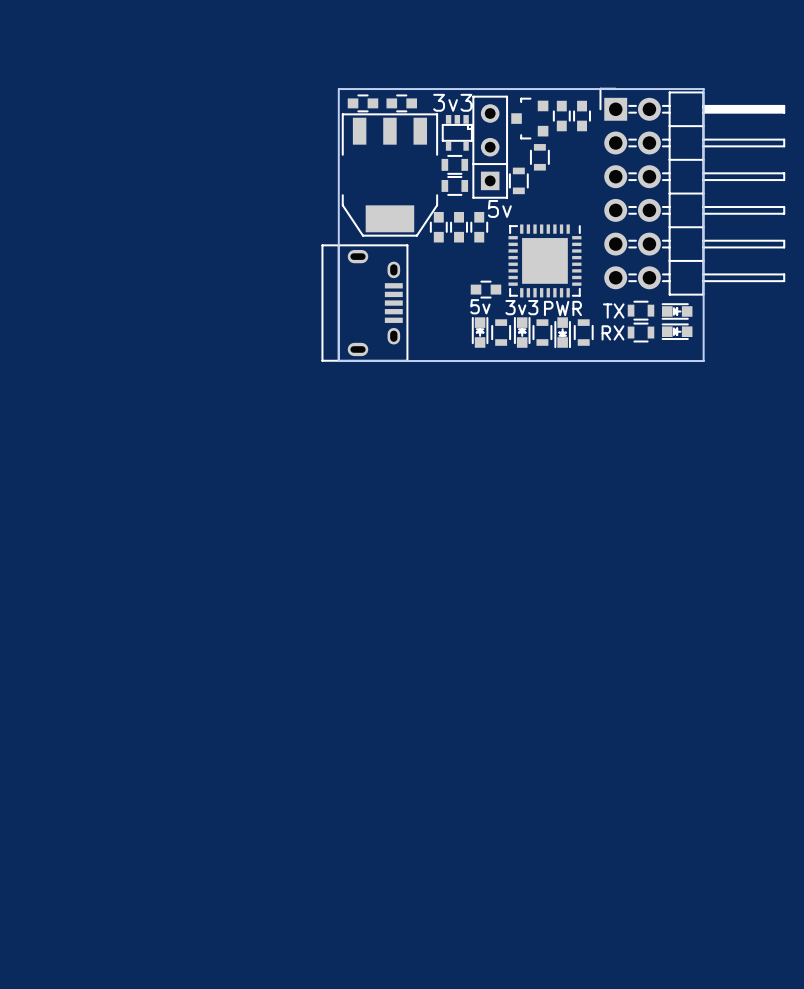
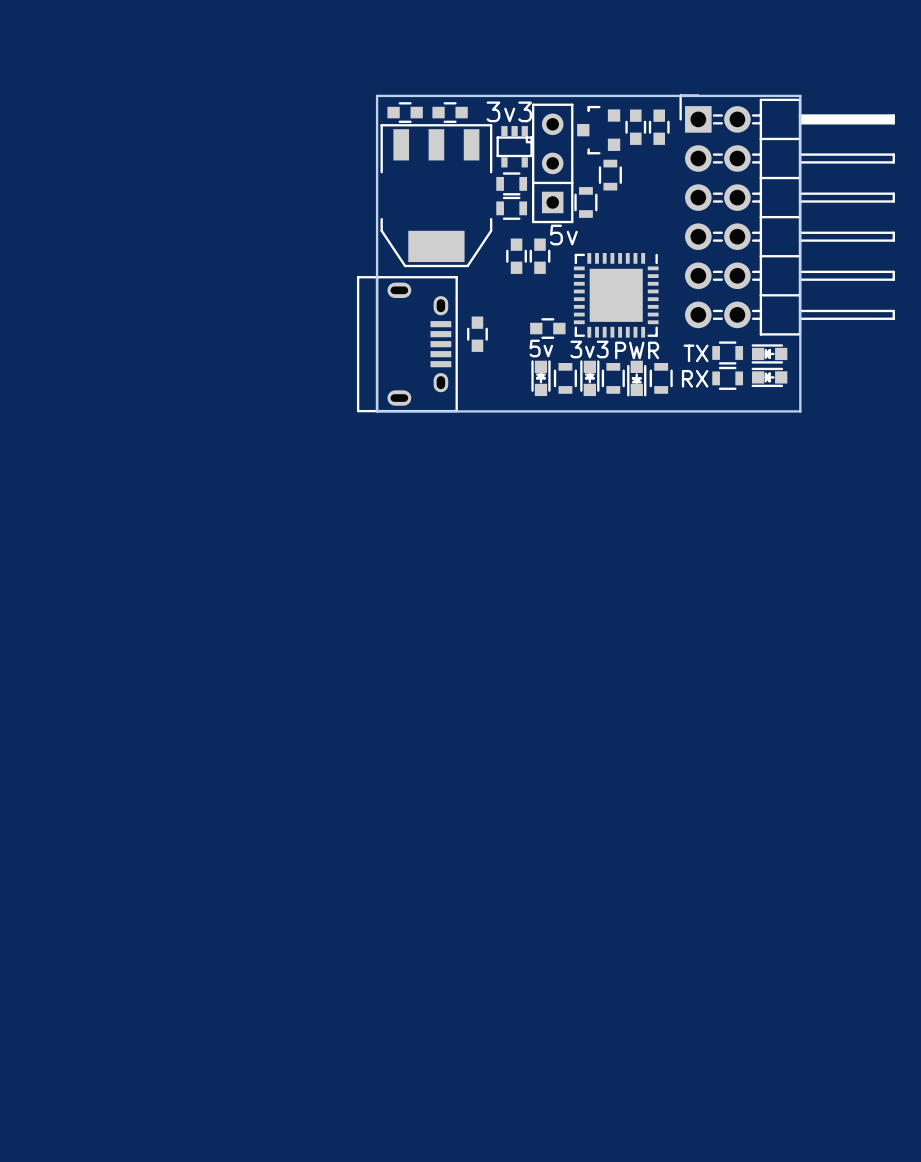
part position: (438, 227) -> (477, 334)

